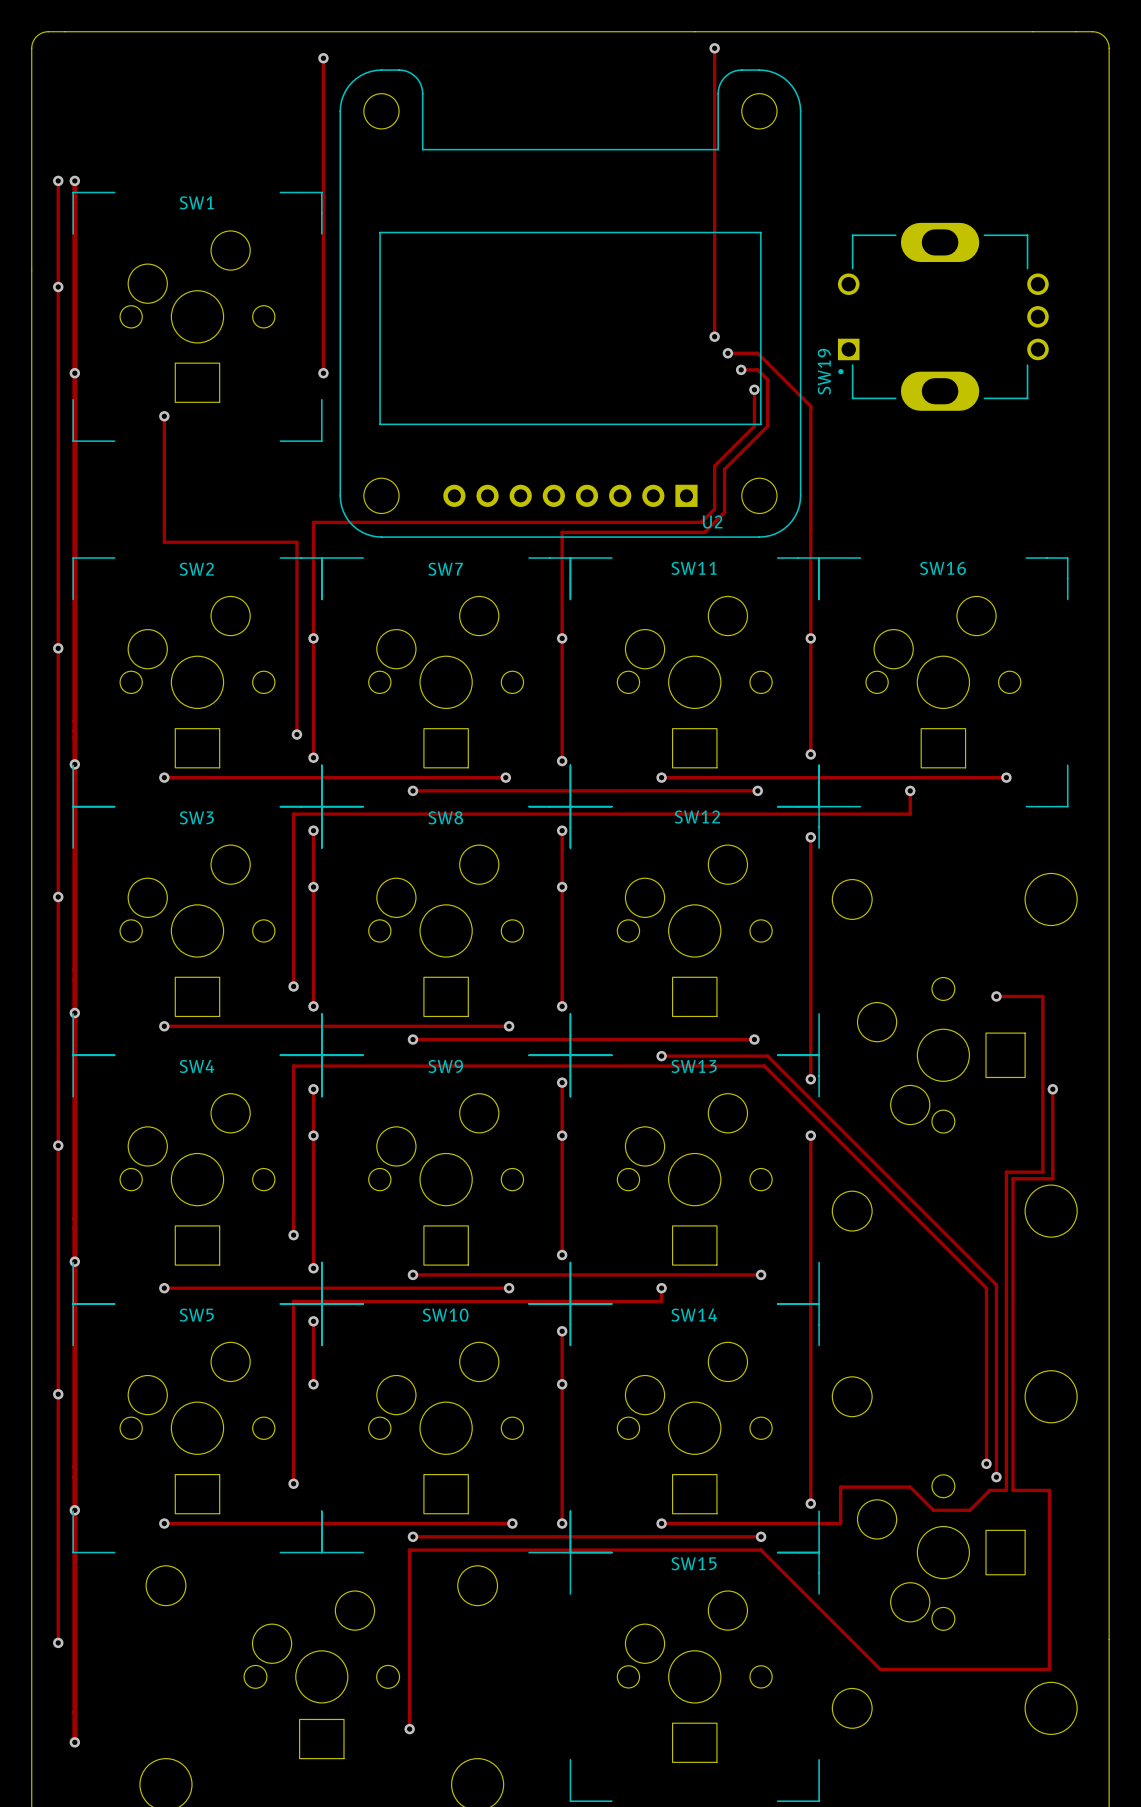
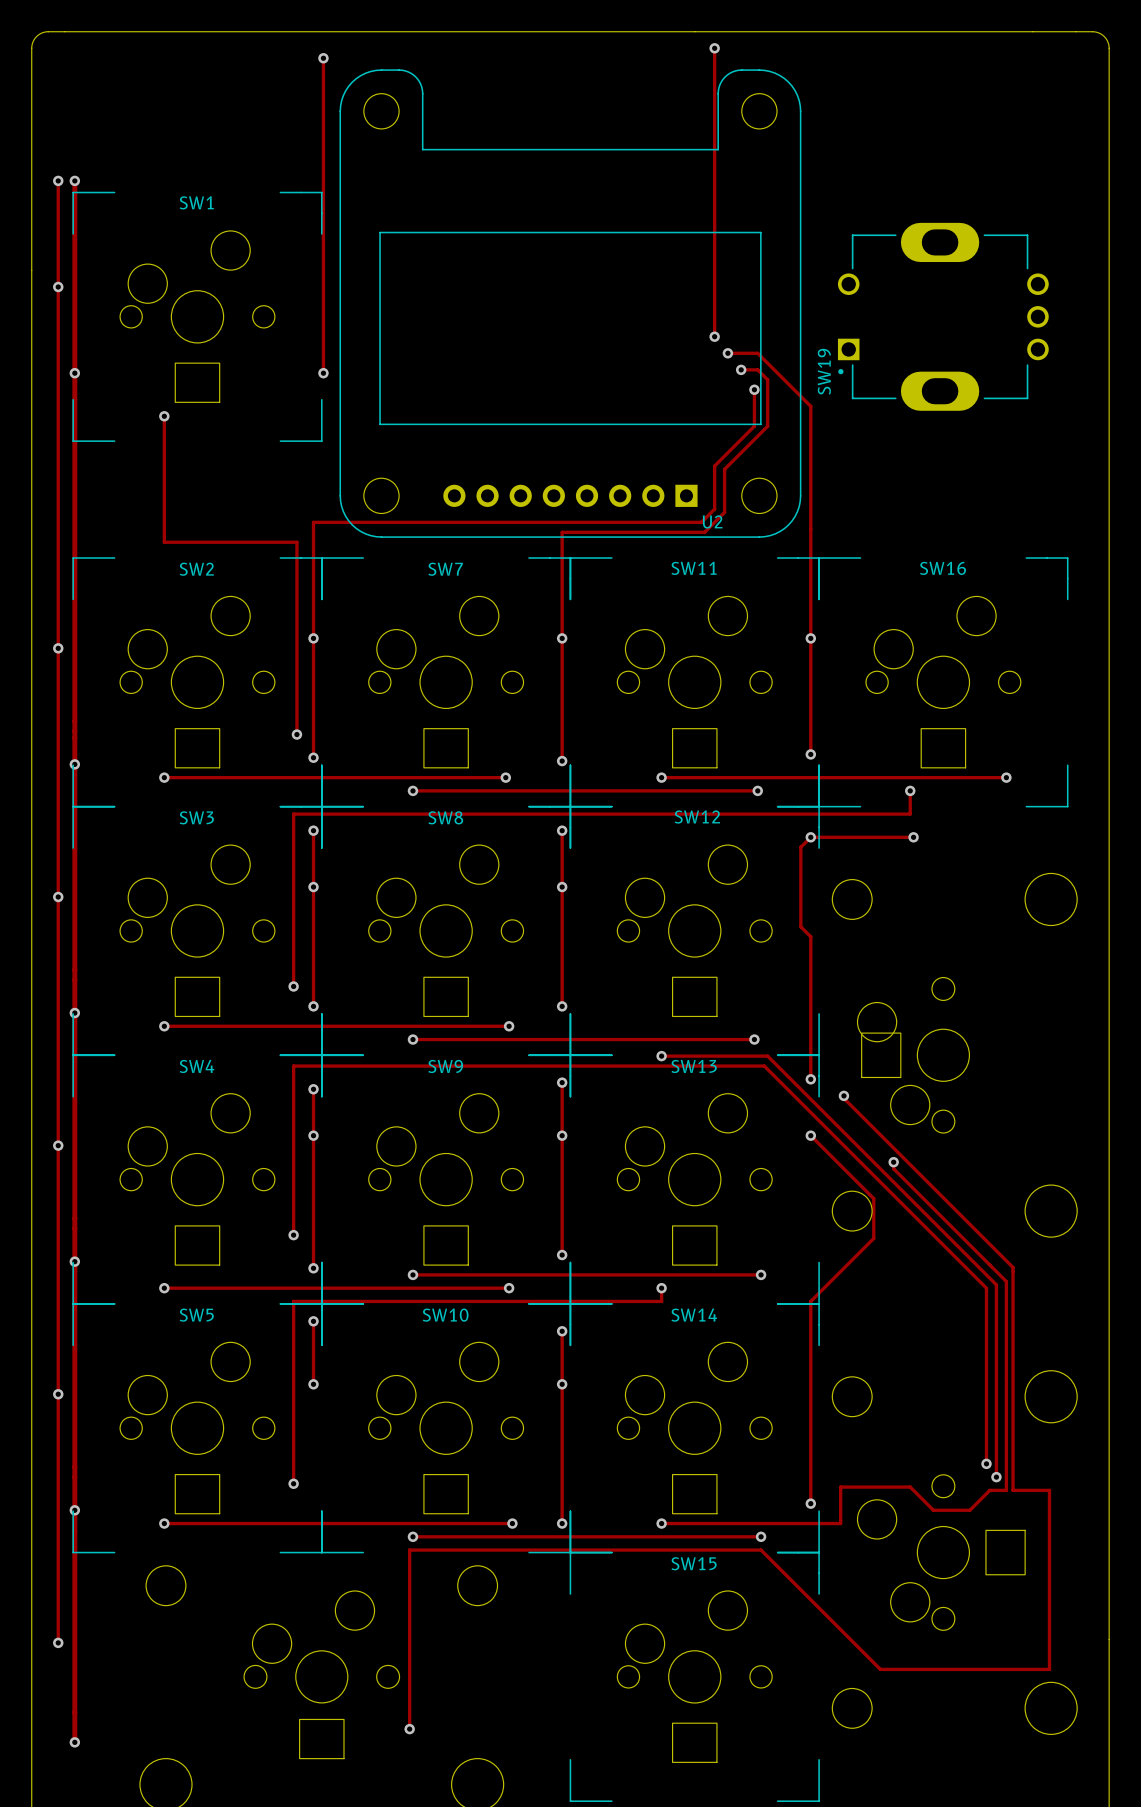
track: (810, 837) (810, 936) -> (913, 837) (810, 837) (800, 847) (800, 926) (810, 936)
via: none -> (913, 837)
track: (996, 996) (1042, 996) (1042, 1172) (1006, 1172) (1006, 1281) -> (893, 1162) (893, 1168) (1006, 1281)
via: (996, 996) -> none
part position: (1005, 1055) -> (881, 1055)
track: (1052, 1089) (1052, 1178) (1013, 1178) (1013, 1267) -> (843, 1095) (843, 1098) (1013, 1267)
via: (1052, 1089) -> none
via: none -> (843, 1095)
track: (810, 1135) (810, 1301) -> (810, 1135) (873, 1198) (873, 1238) (810, 1301)
via: none -> (893, 1162)

